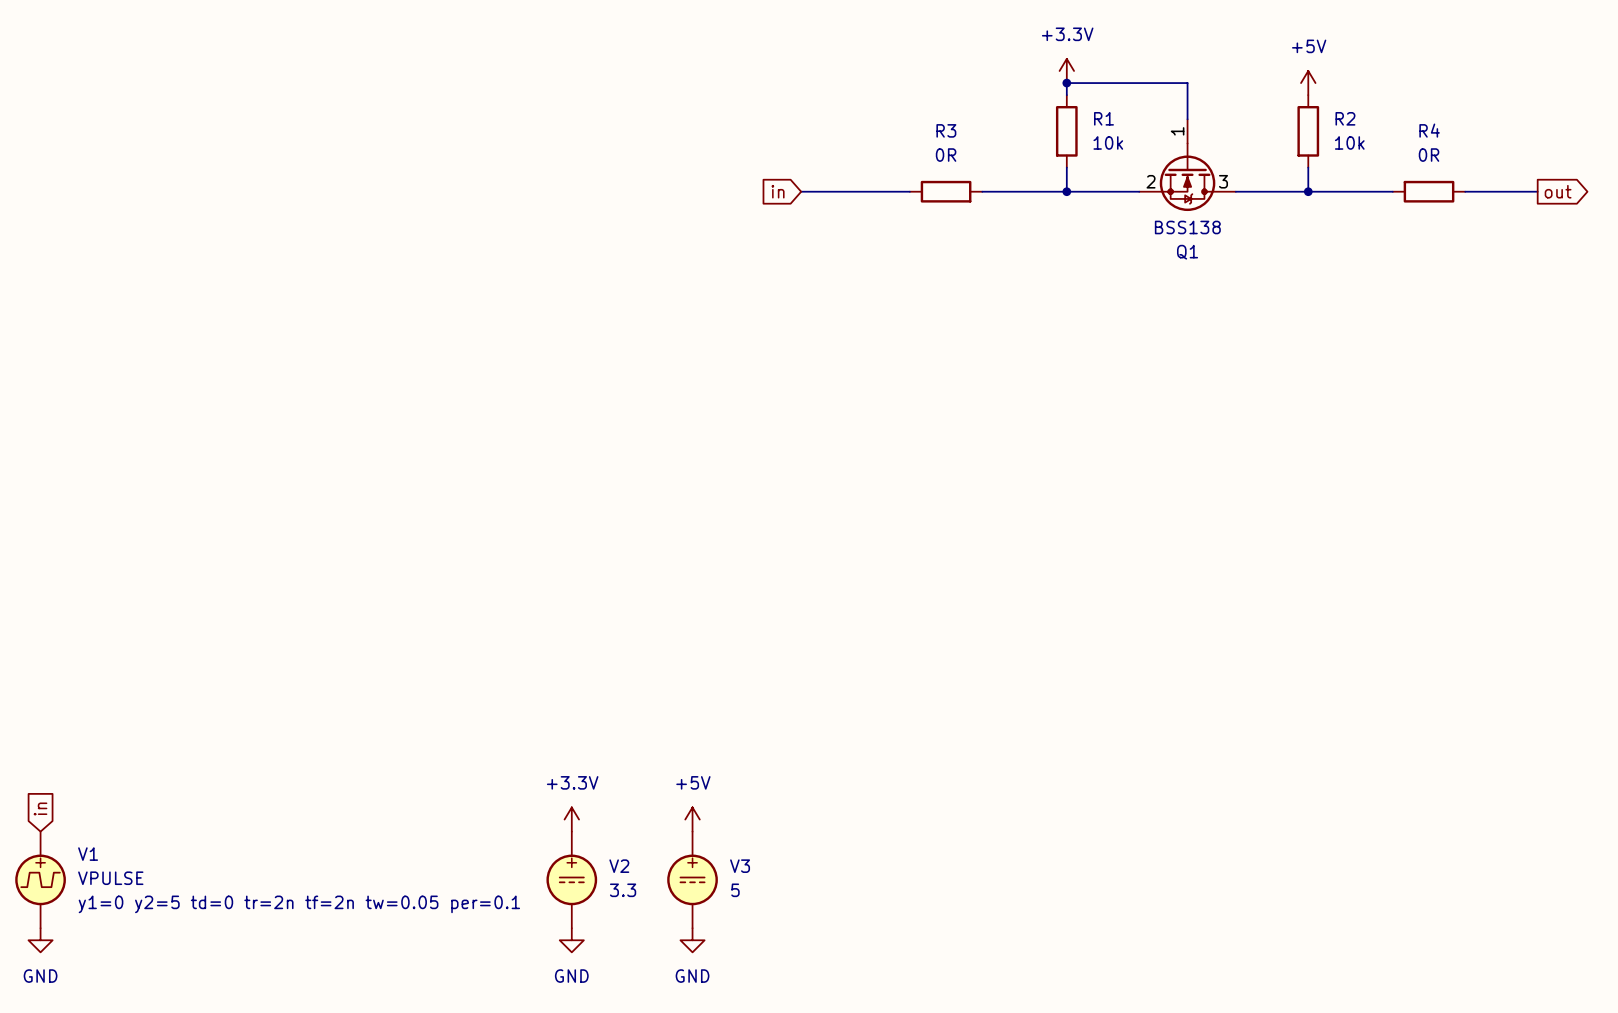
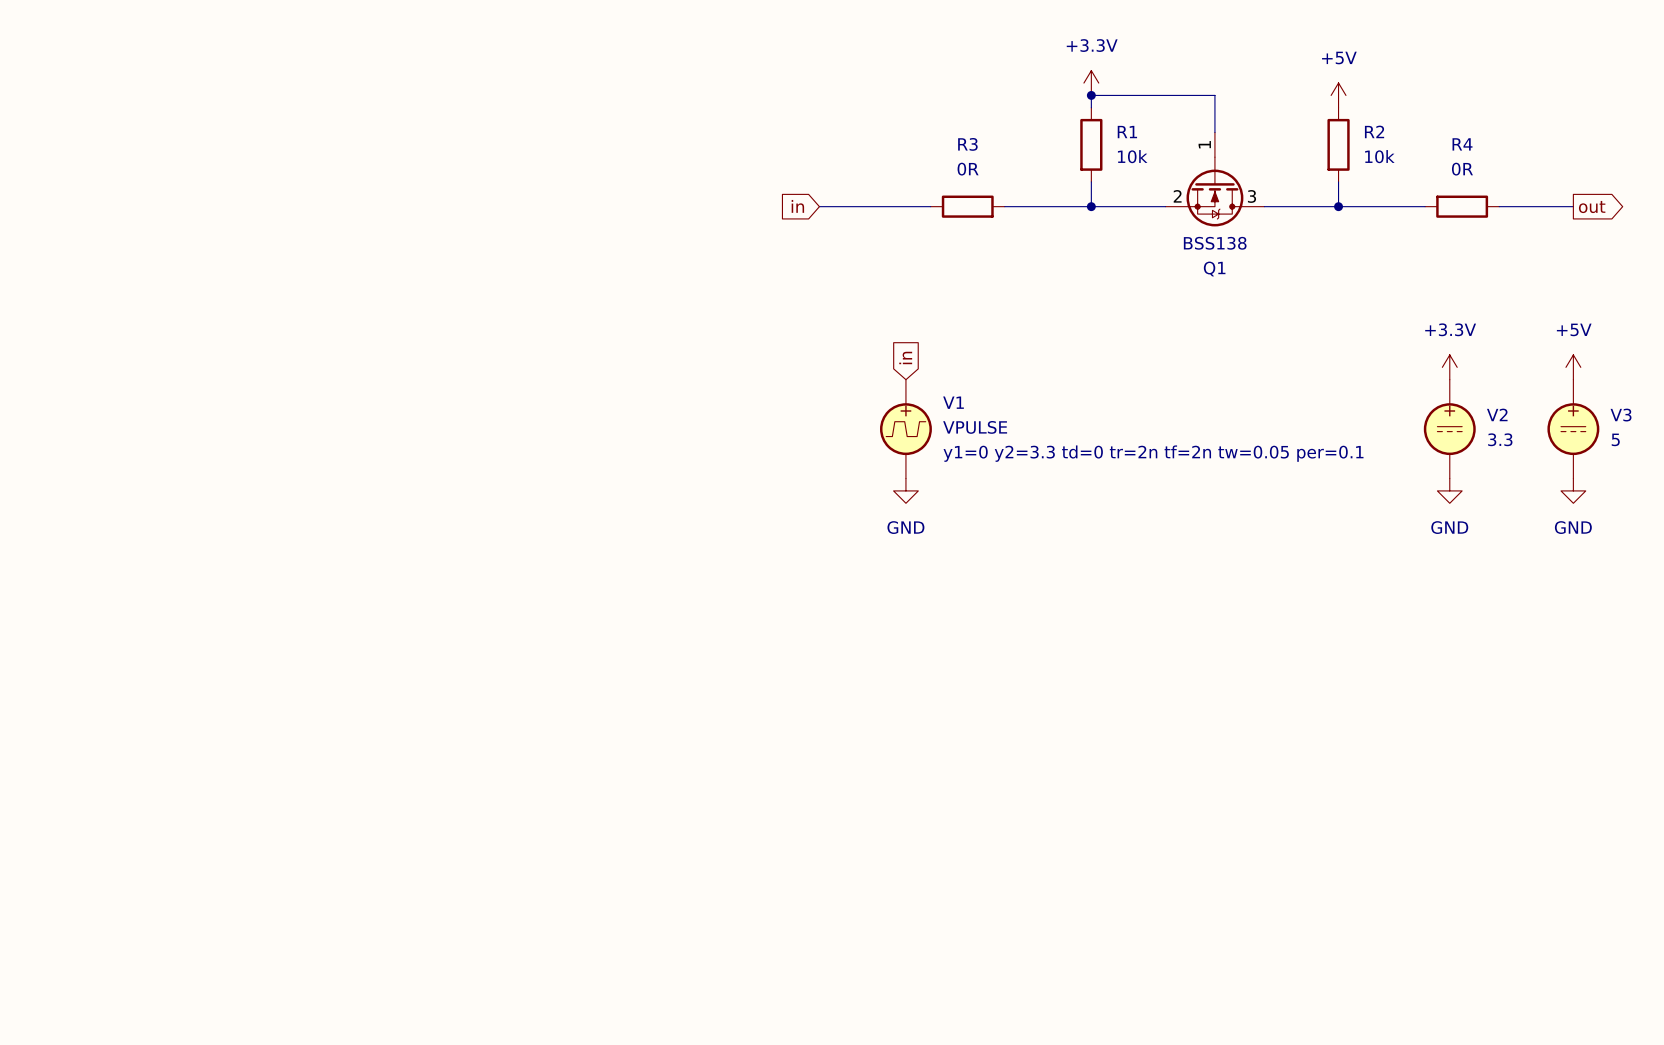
global label: none -> in (905, 357)
power symbol: none -> +3.3V (1449, 367)
power symbol: none -> +5V (1573, 367)
power symbol: none -> GND (905, 490)
power symbol: none -> GND (1449, 490)
power symbol: none -> GND (1573, 490)
global label: in (40, 809) -> none
power symbol: +3.3V (571, 819) -> none
power symbol: +5V (692, 819) -> none
V1 position: (40, 879) -> (905, 429)
V2 position: (571, 879) -> (1449, 429)
V3 position: (692, 879) -> (1573, 429)
V1 text: y1=0 y2=5 td=0 tr=2n tf=2n tw=0.05 per=0.1 (299, 904) -> y1=0 y2=3.3 td=0 tr=2n tf=2n tw=0.05 per=0.1 (1153, 453)
power symbol: GND (40, 940) -> none
power symbol: GND (571, 940) -> none
power symbol: GND (692, 940) -> none

